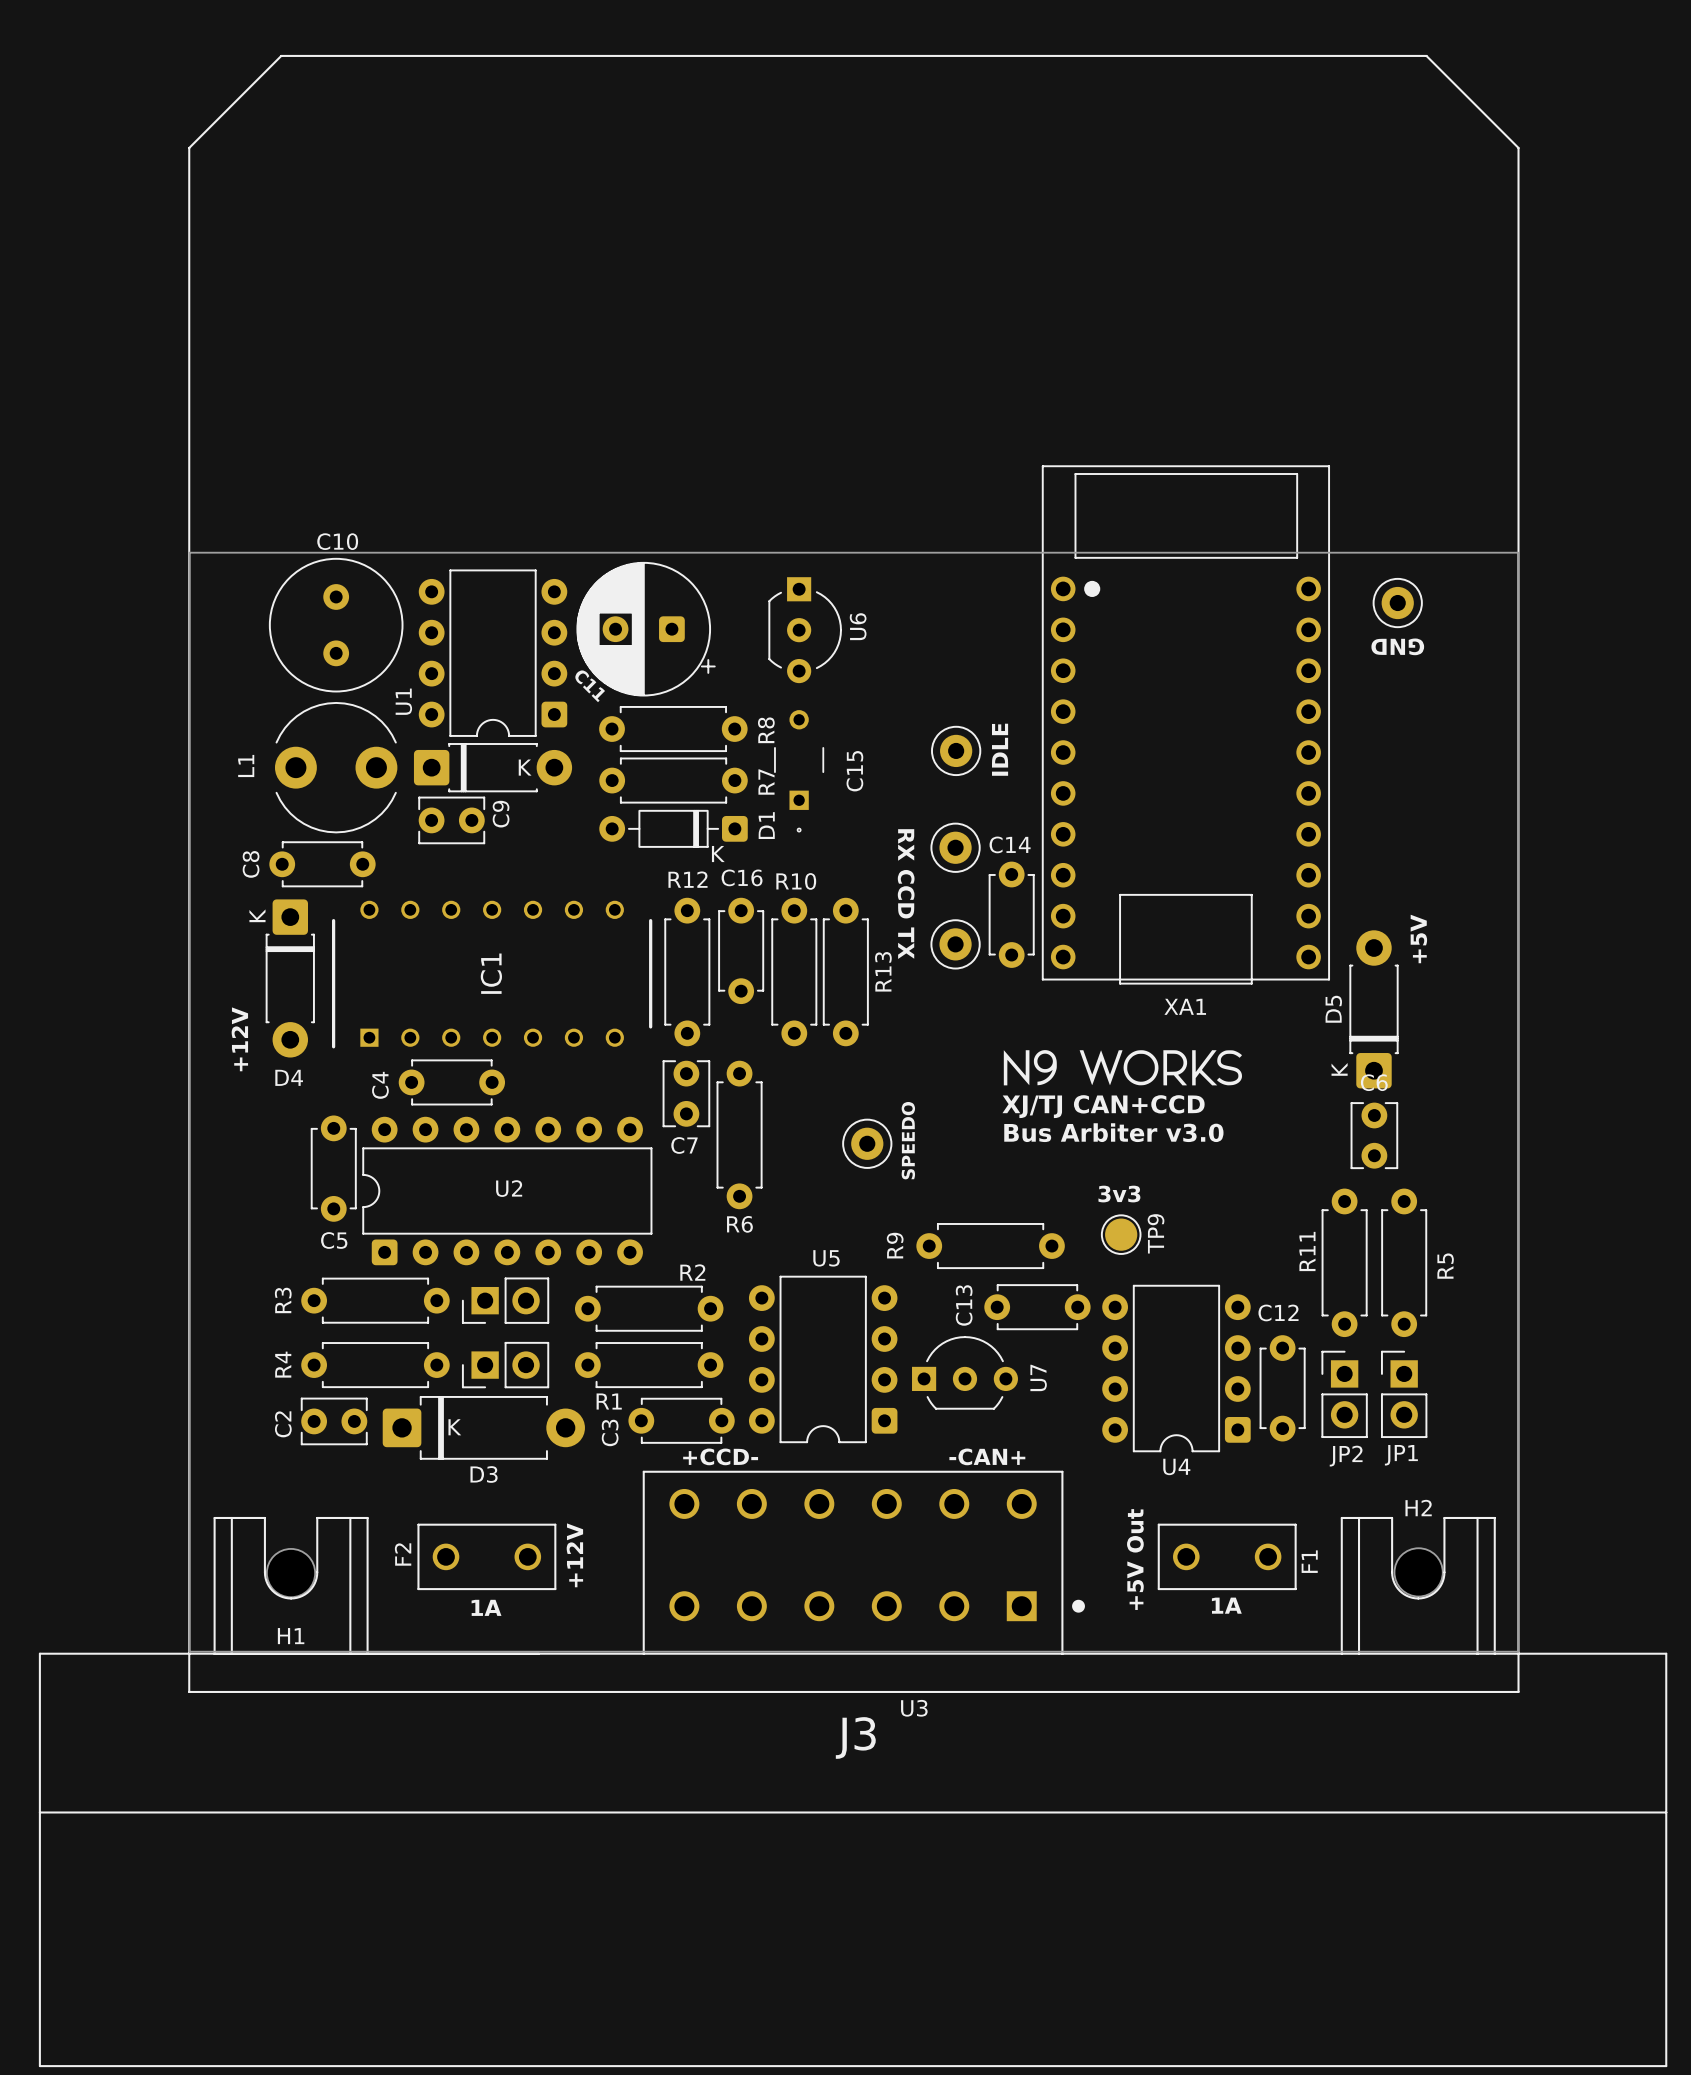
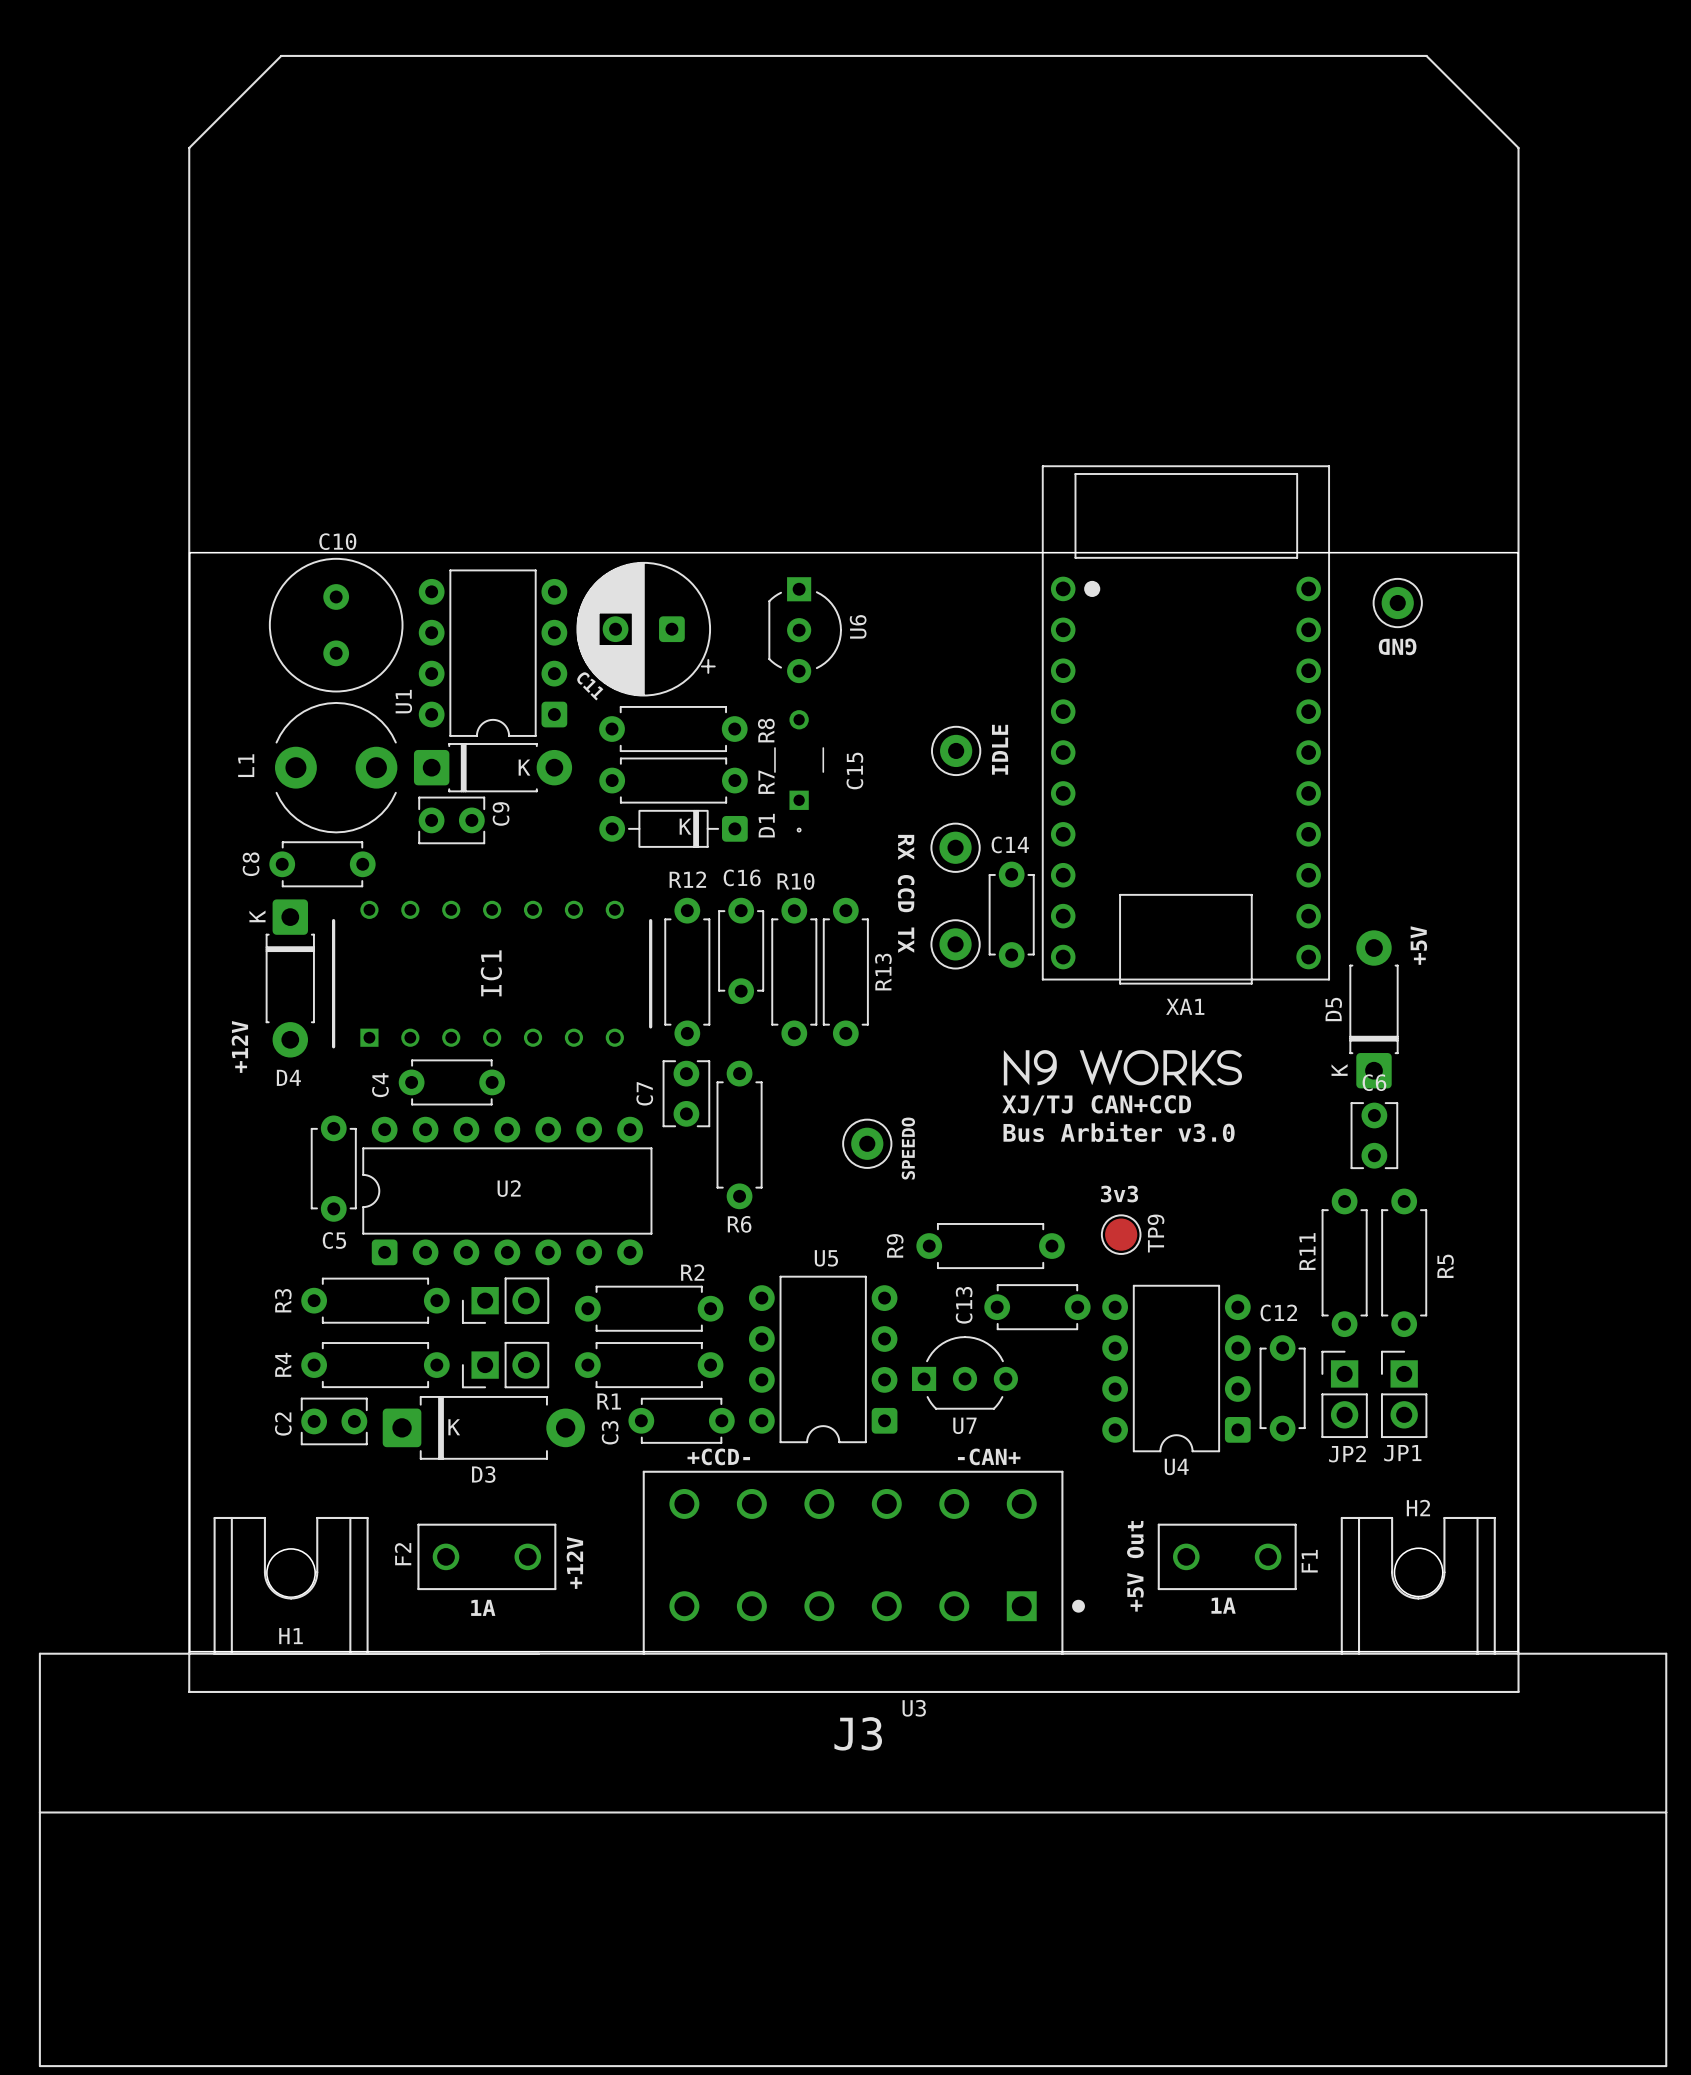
D1 text position: K (718, 854) -> K (685, 826)
C7 name rotation: 0° (684, 1145) -> 90° counterclockwise (644, 1093)
C7 name position: C7 (684, 1145) -> C7 (644, 1093)
U7 name rotation: 0° (1038, 1377) -> 90° clockwise (964, 1425)
U7 name position: U7 (1038, 1377) -> U7 (964, 1425)

